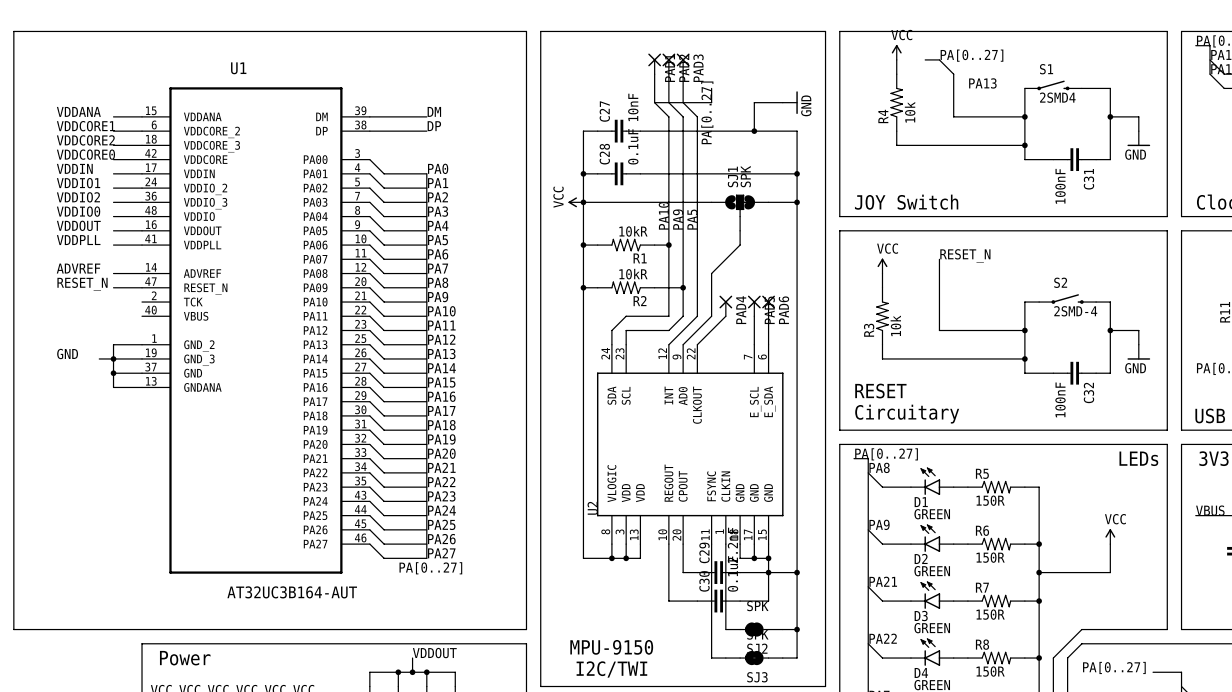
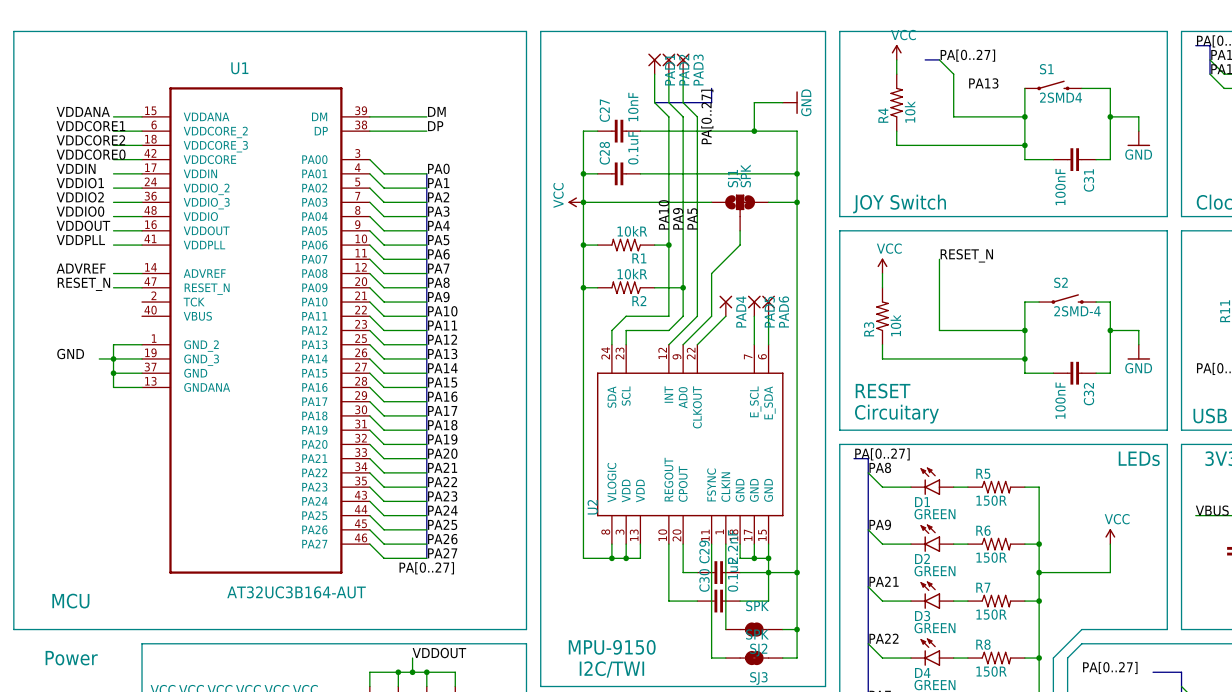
text: none -> MCU (70, 601)
text position: Power (185, 658) -> Power (71, 658)

